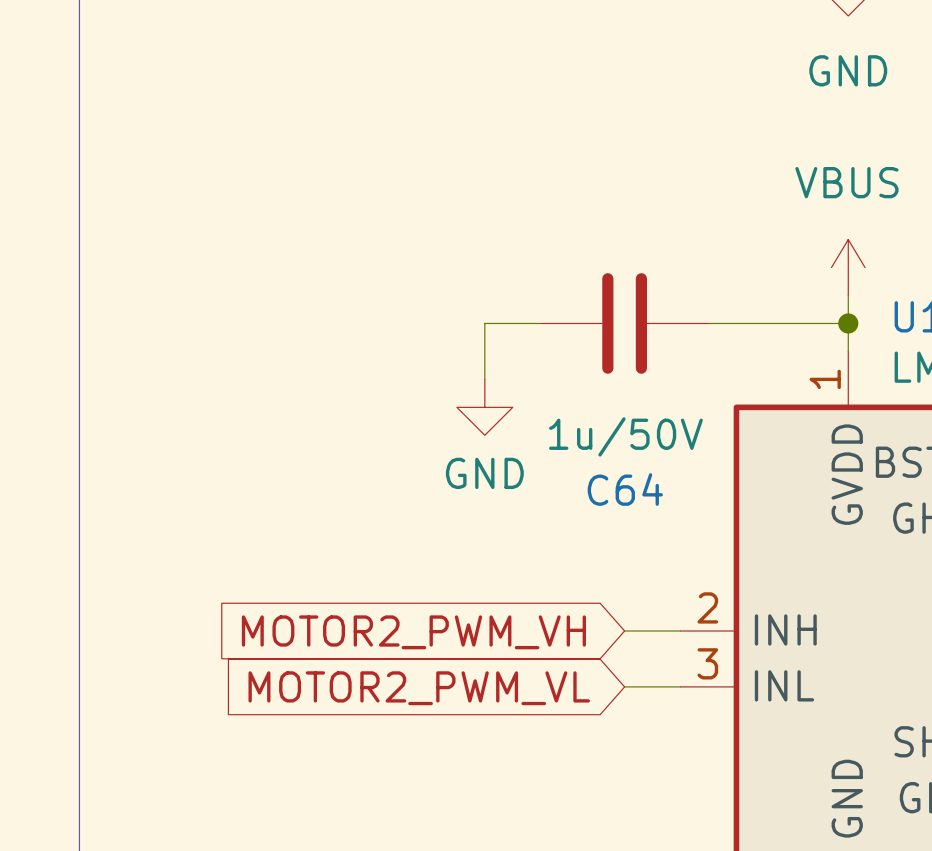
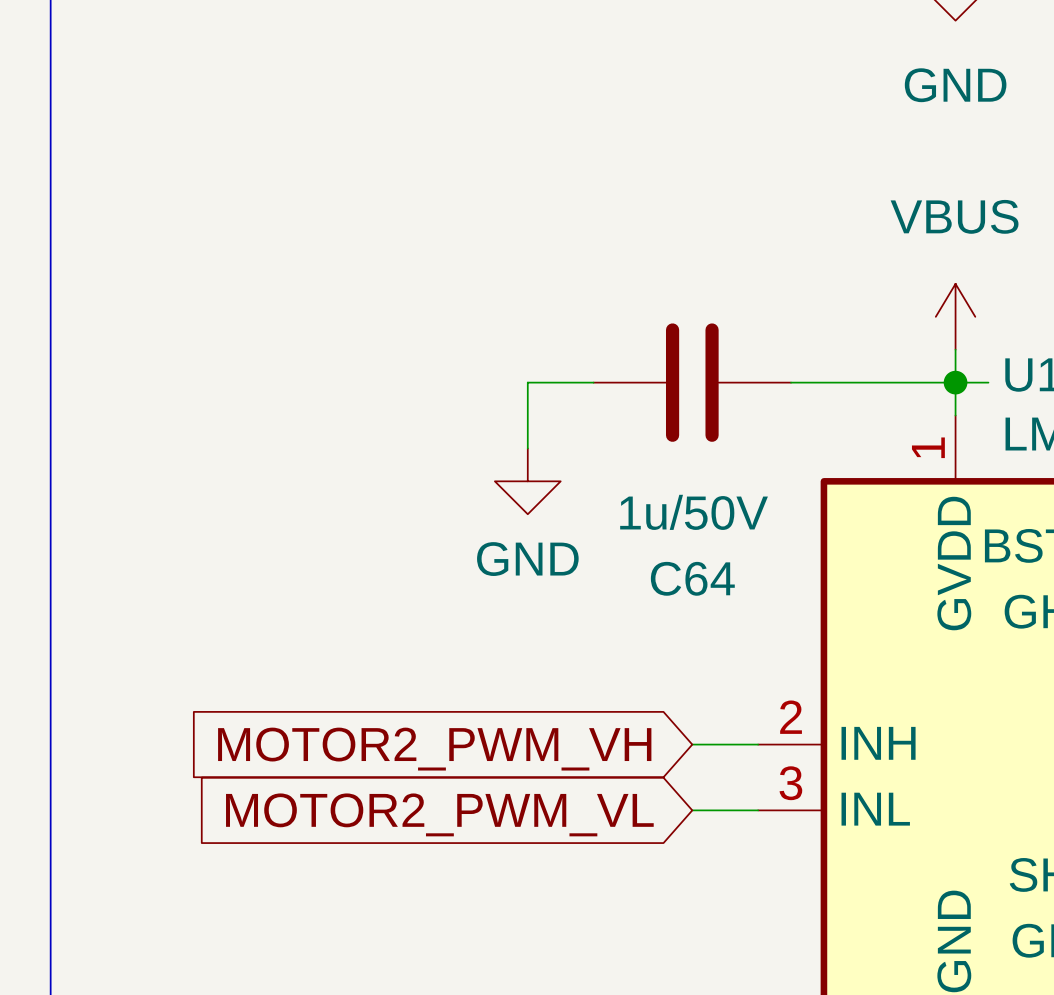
wire: none -> (955, 382) (988, 382)

